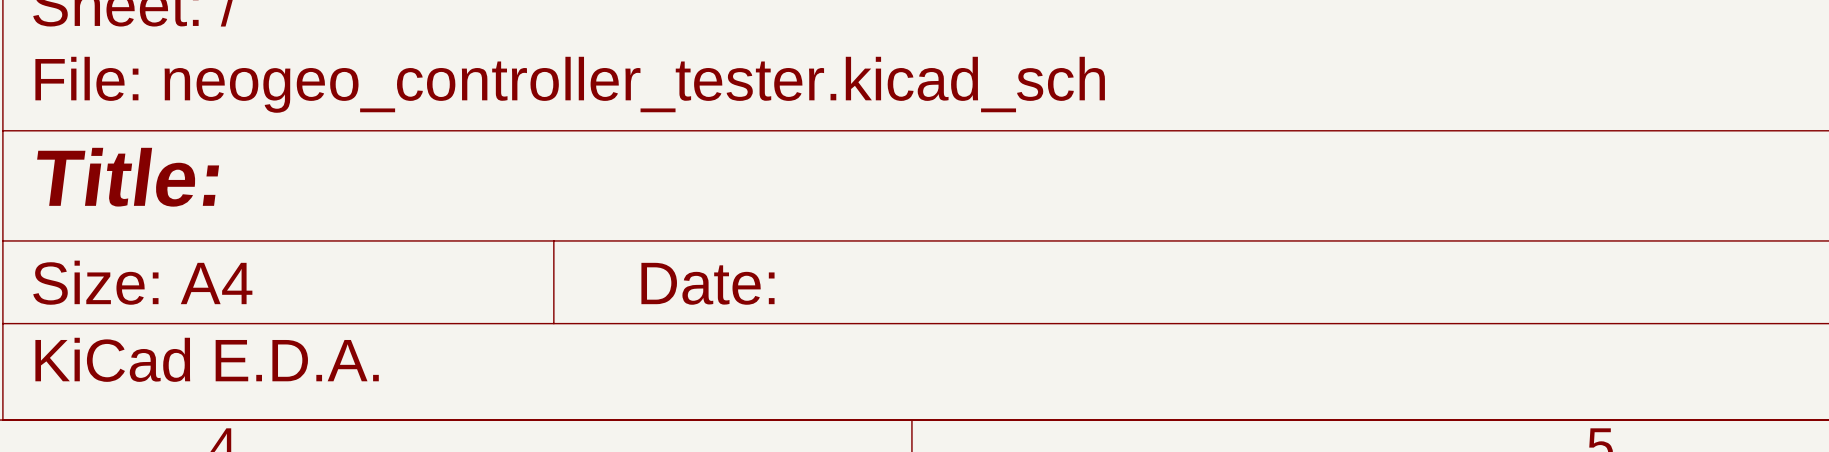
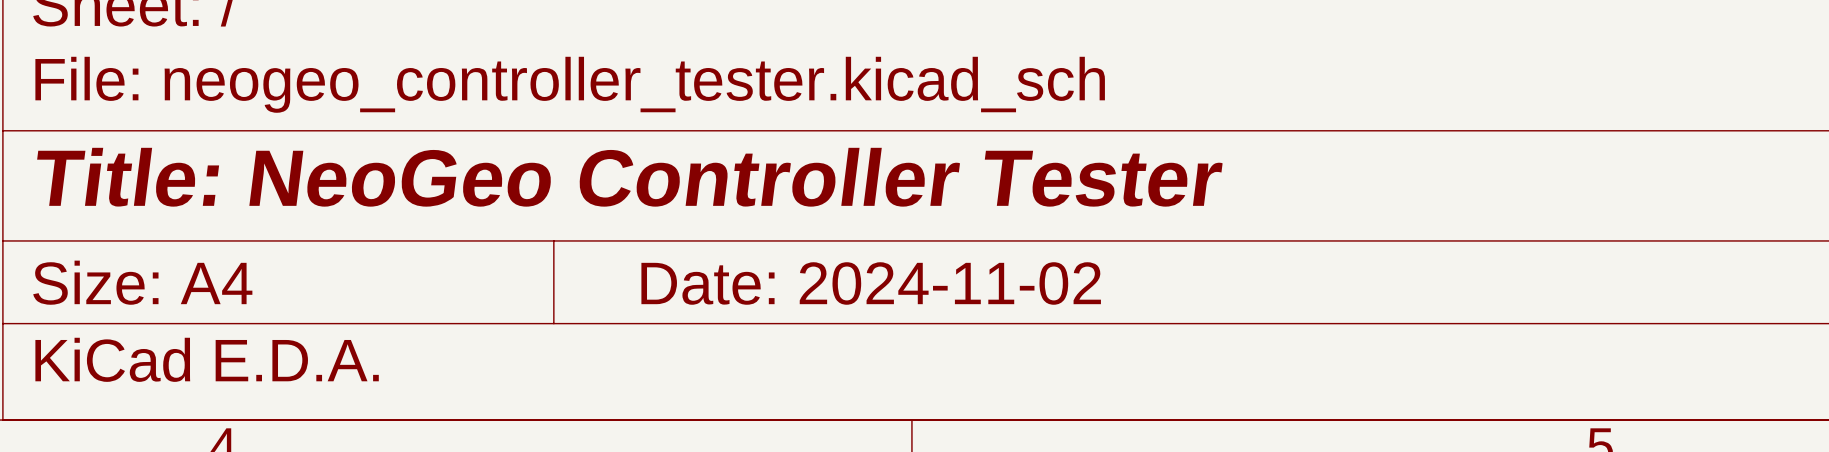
title block: Title: (128, 177) -> Title: NeoGeo Controller Tester (629, 177)
title block: Date: (707, 283) -> Date: 2024-11-02 (871, 283)

